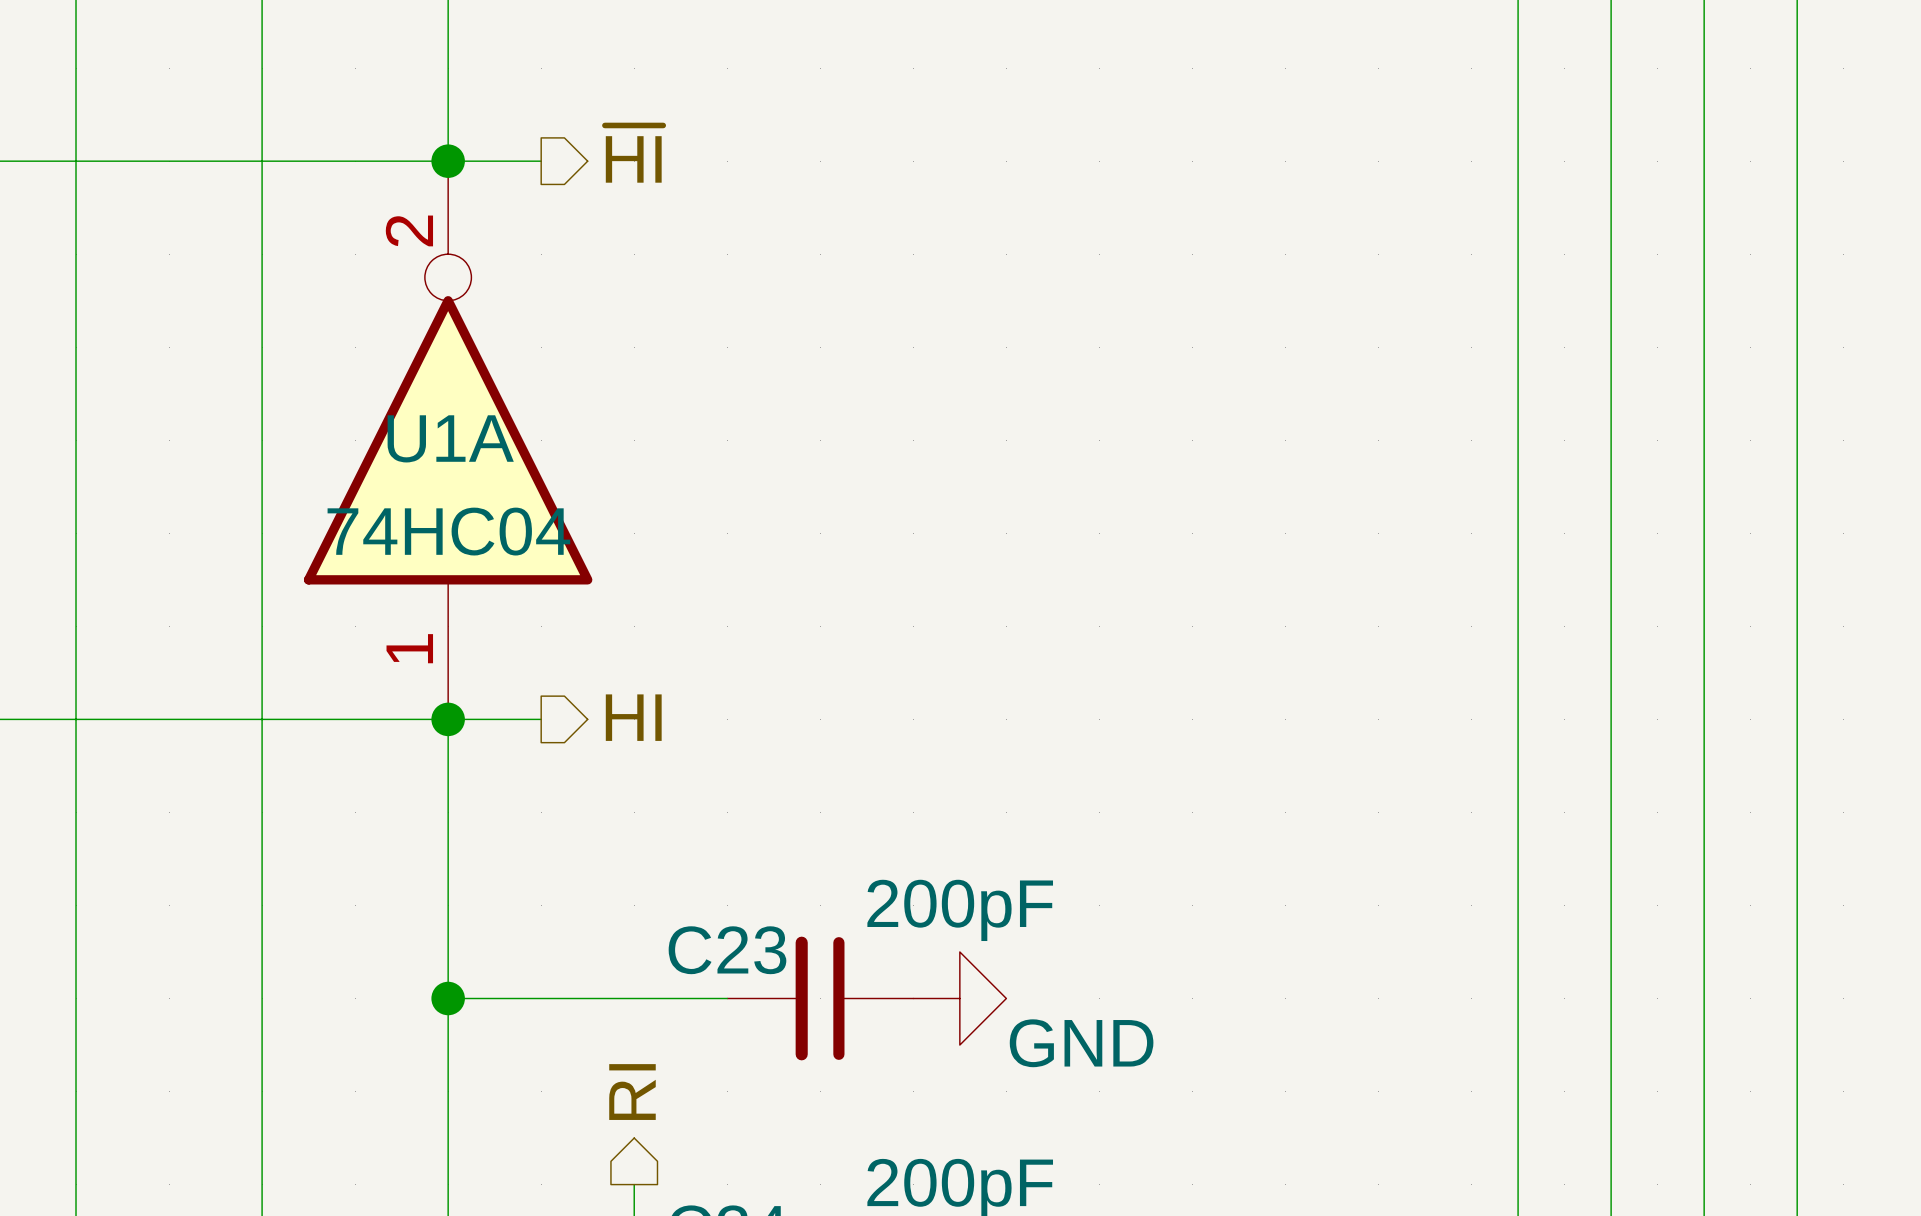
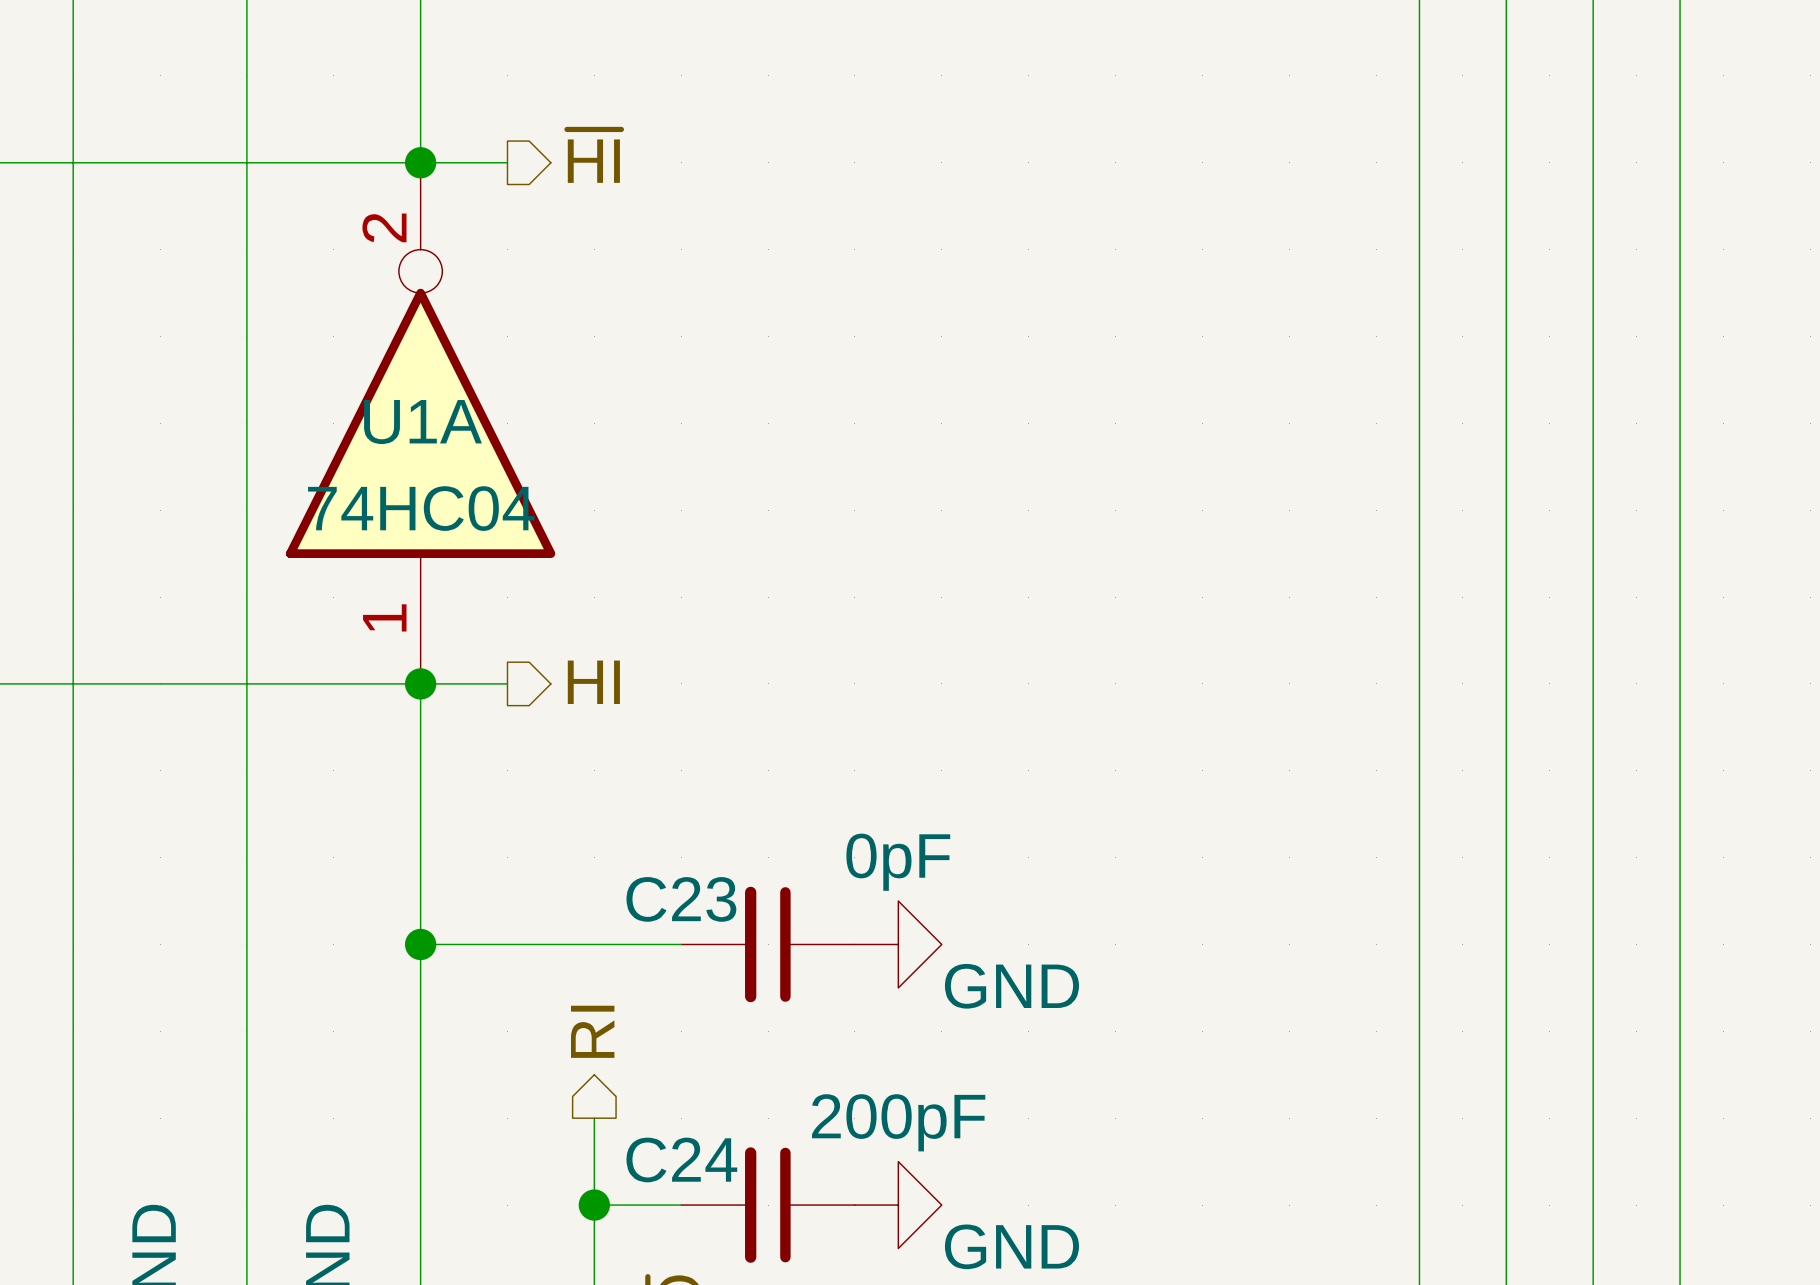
C23 value: 200pF (960, 910) -> 0pF (898, 862)

